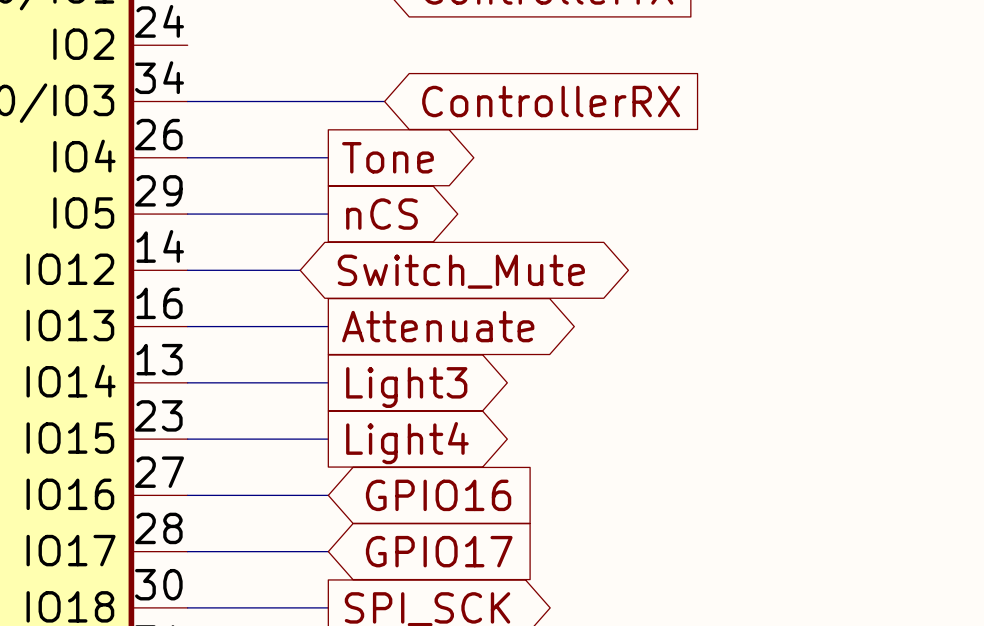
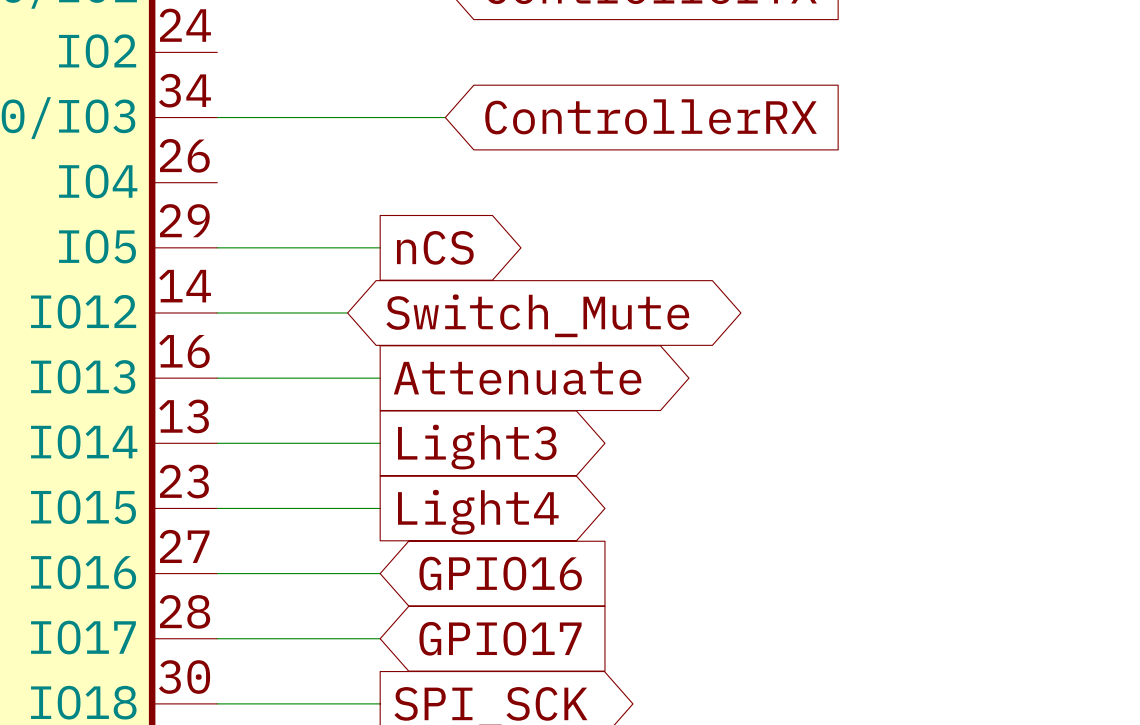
wire: (187, 157) (328, 157) -> none
global label: Tone (387, 157) -> none

